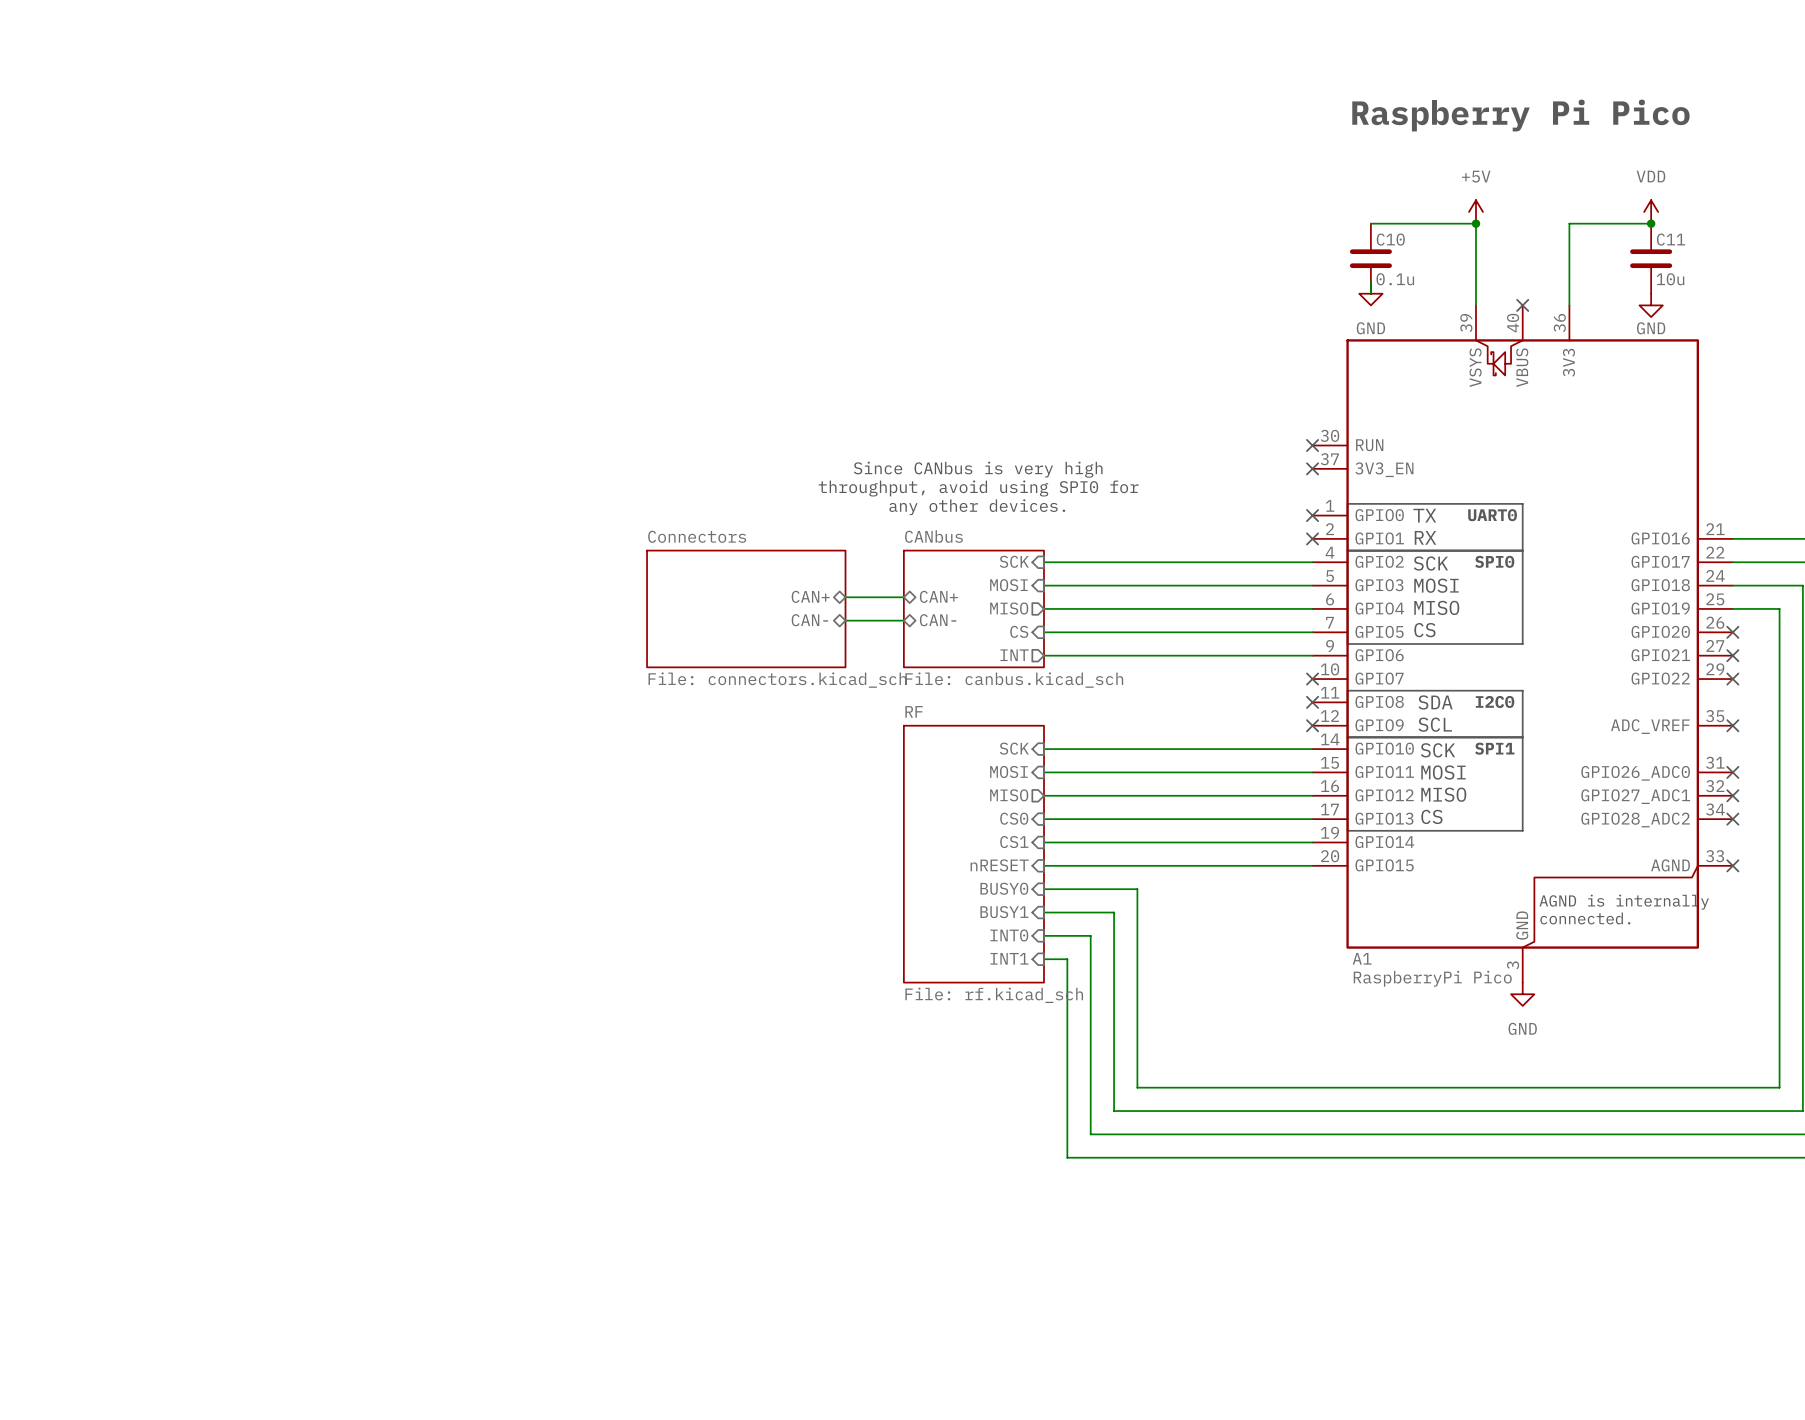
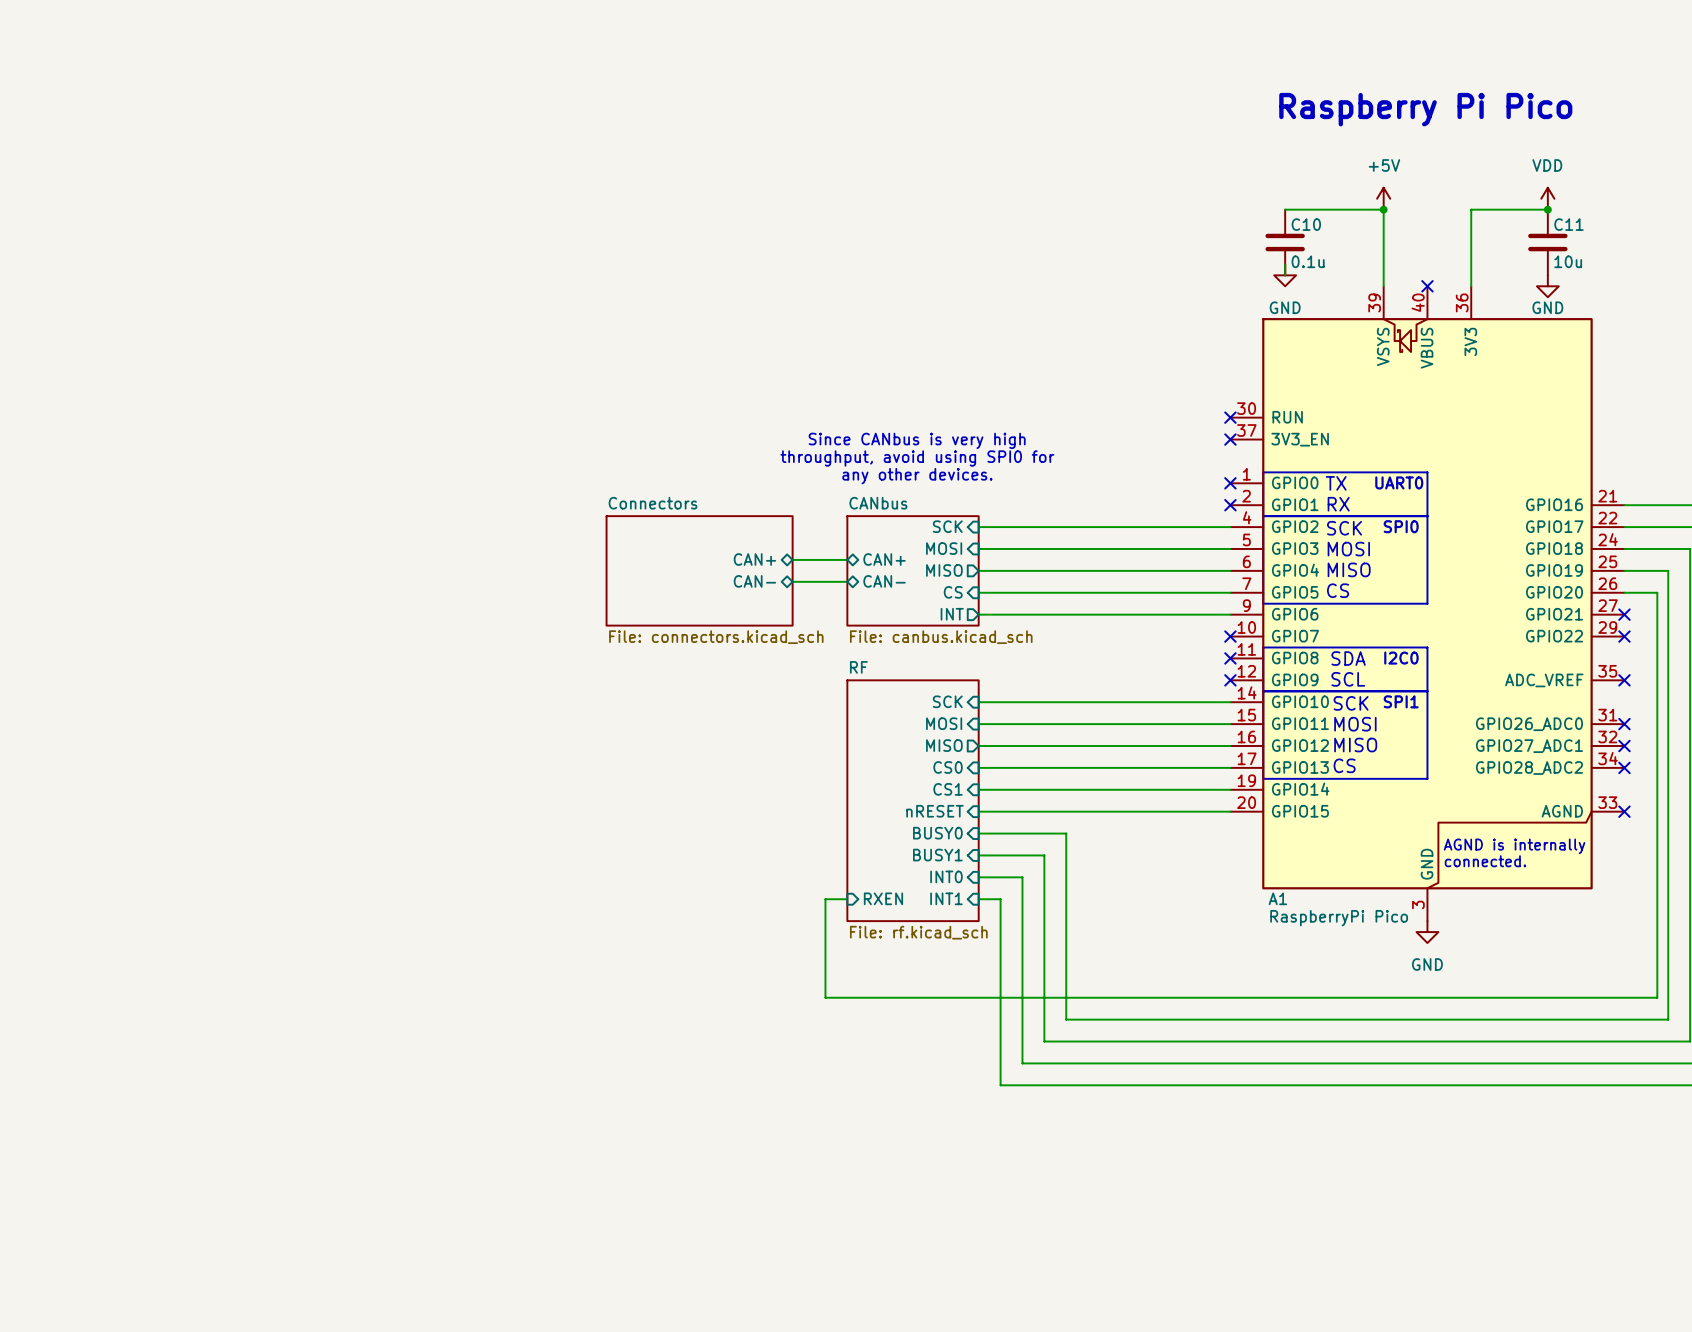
wire: none -> (1624, 592) (1657, 592) (1657, 997) (825, 997) (825, 899) (847, 899)
no-connect mark: (1732, 632) -> none
sheet pin: none -> RXEN (883, 898)

